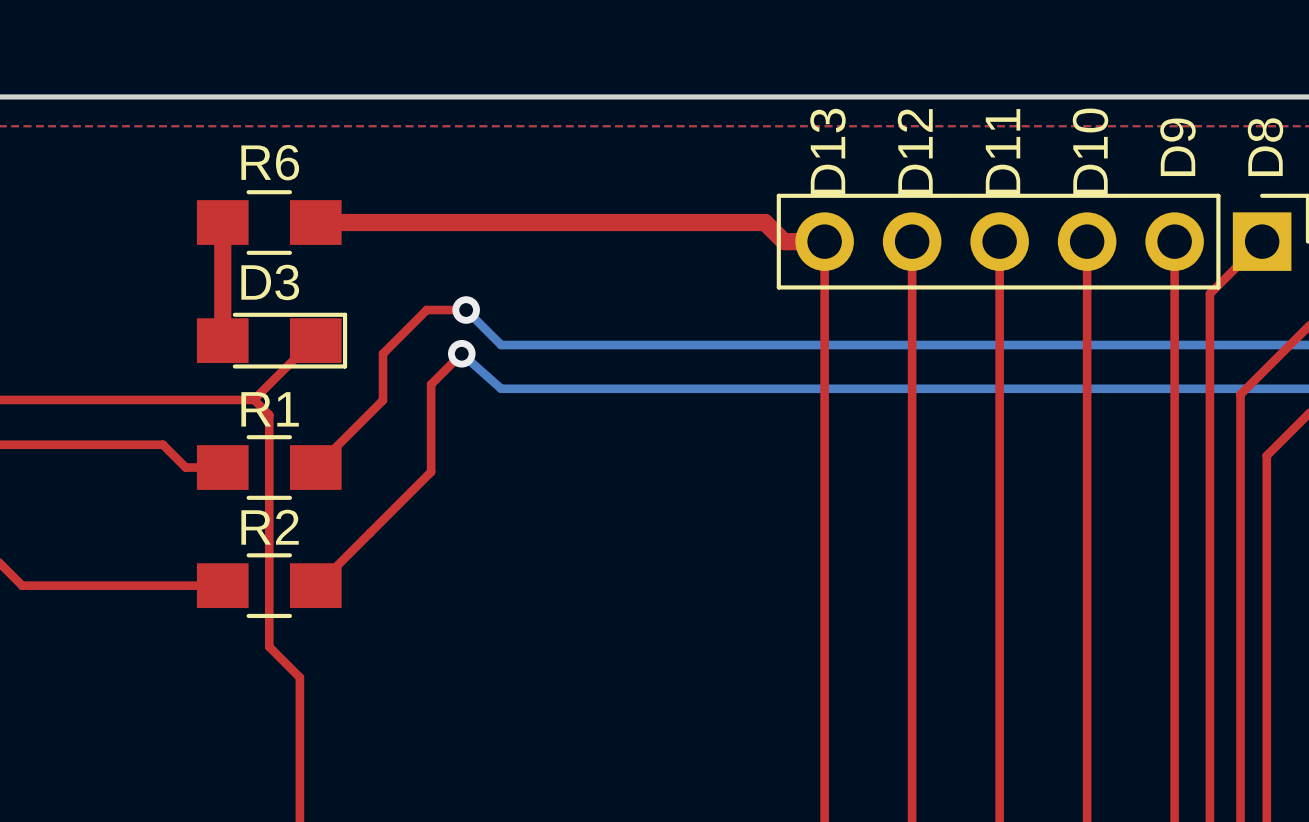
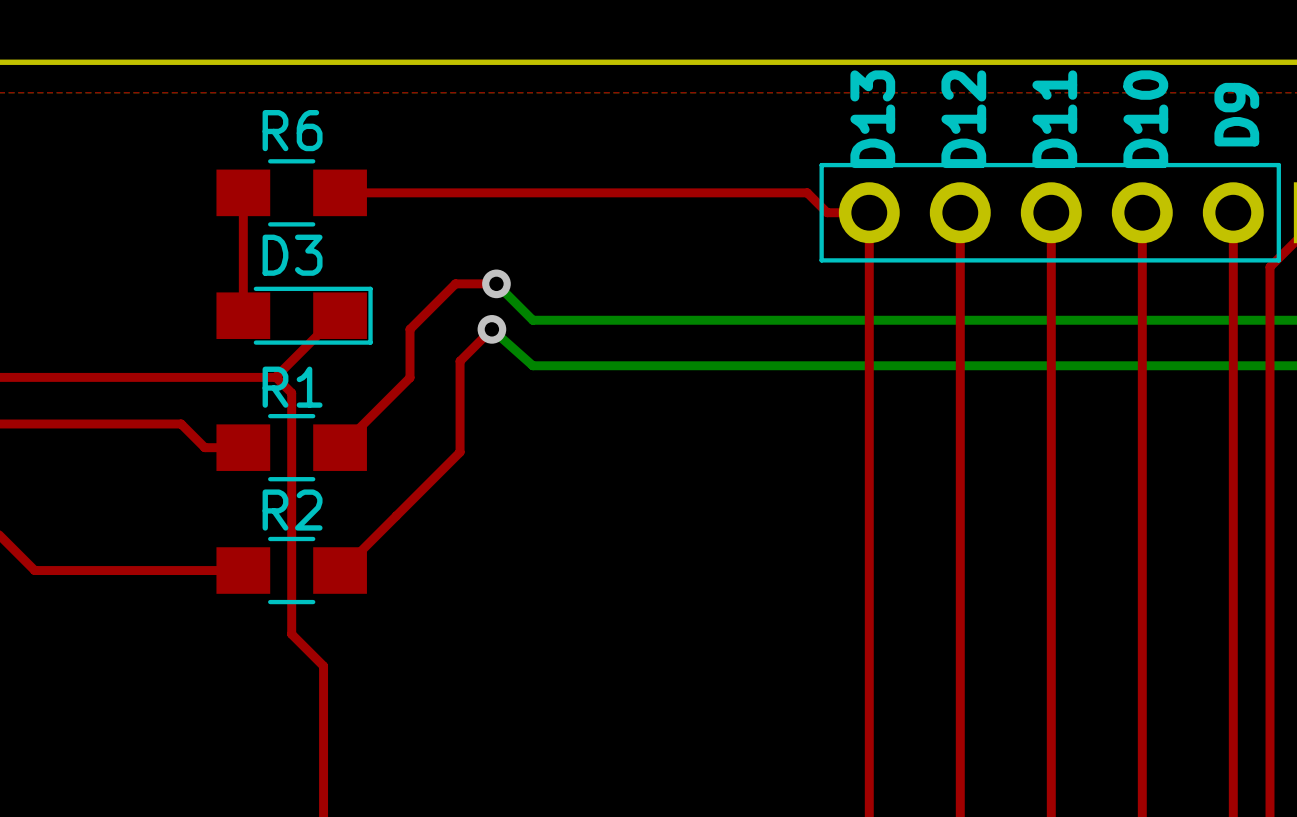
top track width: thick (222, 222) (222, 340) -> thin (243, 192) (243, 315)
top track width: thick (315, 222) (765, 222) (784, 241) (824, 241) -> thin (340, 192) (807, 192) (827, 212) (869, 212)

